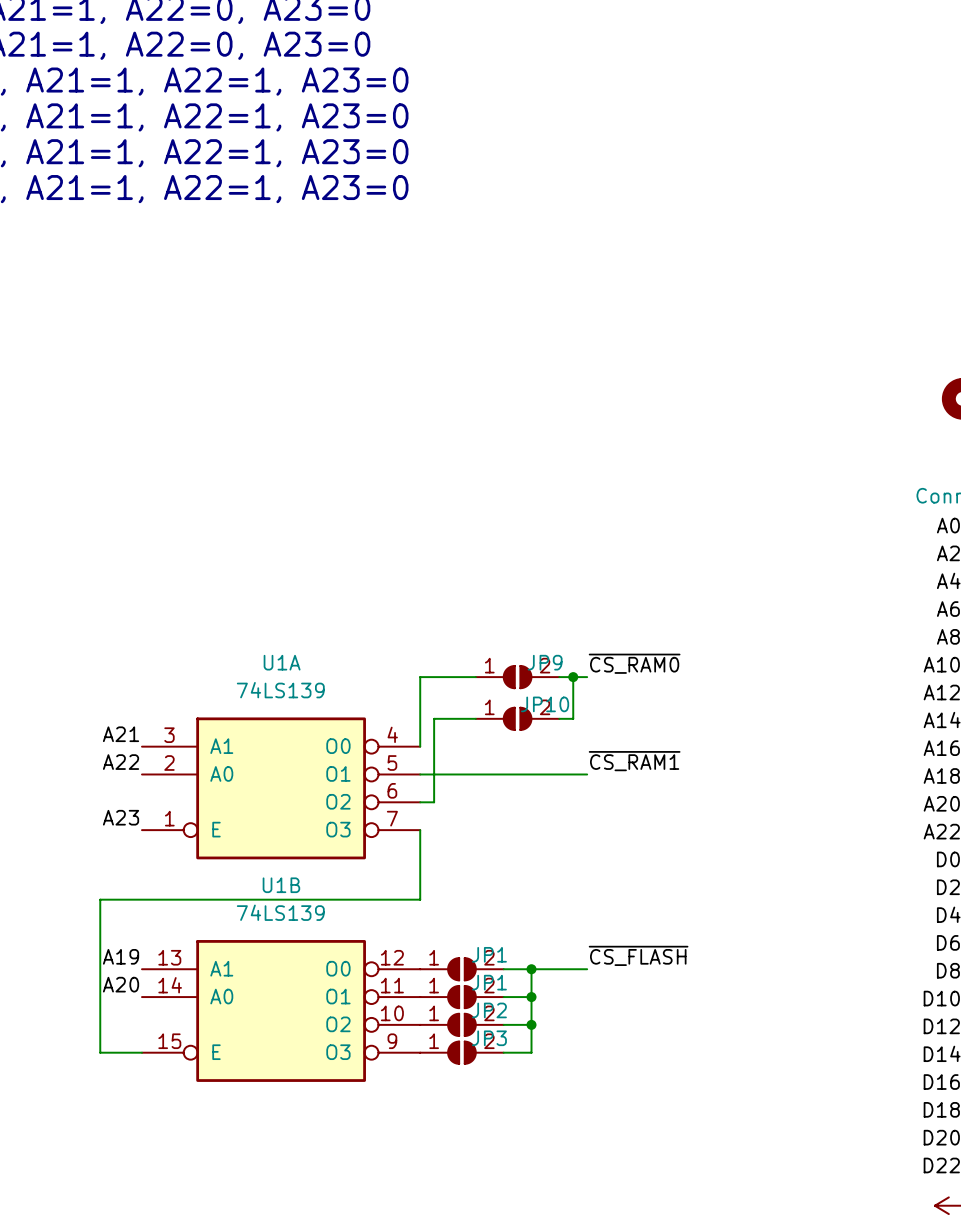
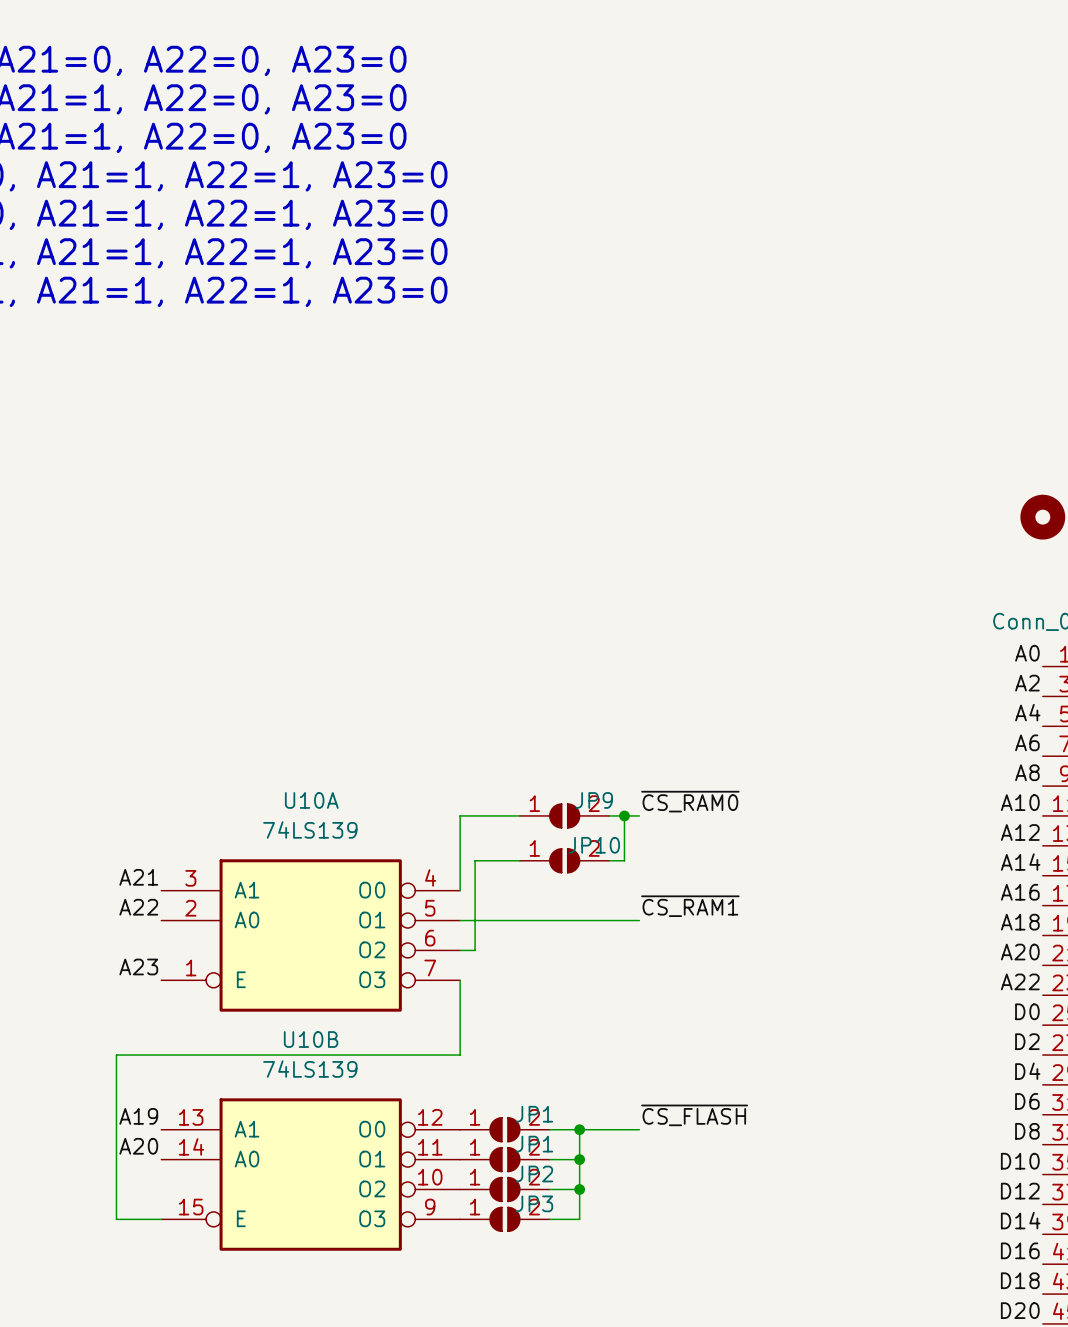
U1A name: U1A (282, 662) -> U10A (311, 800)
U1B name: U1B (281, 885) -> U10B (311, 1039)

